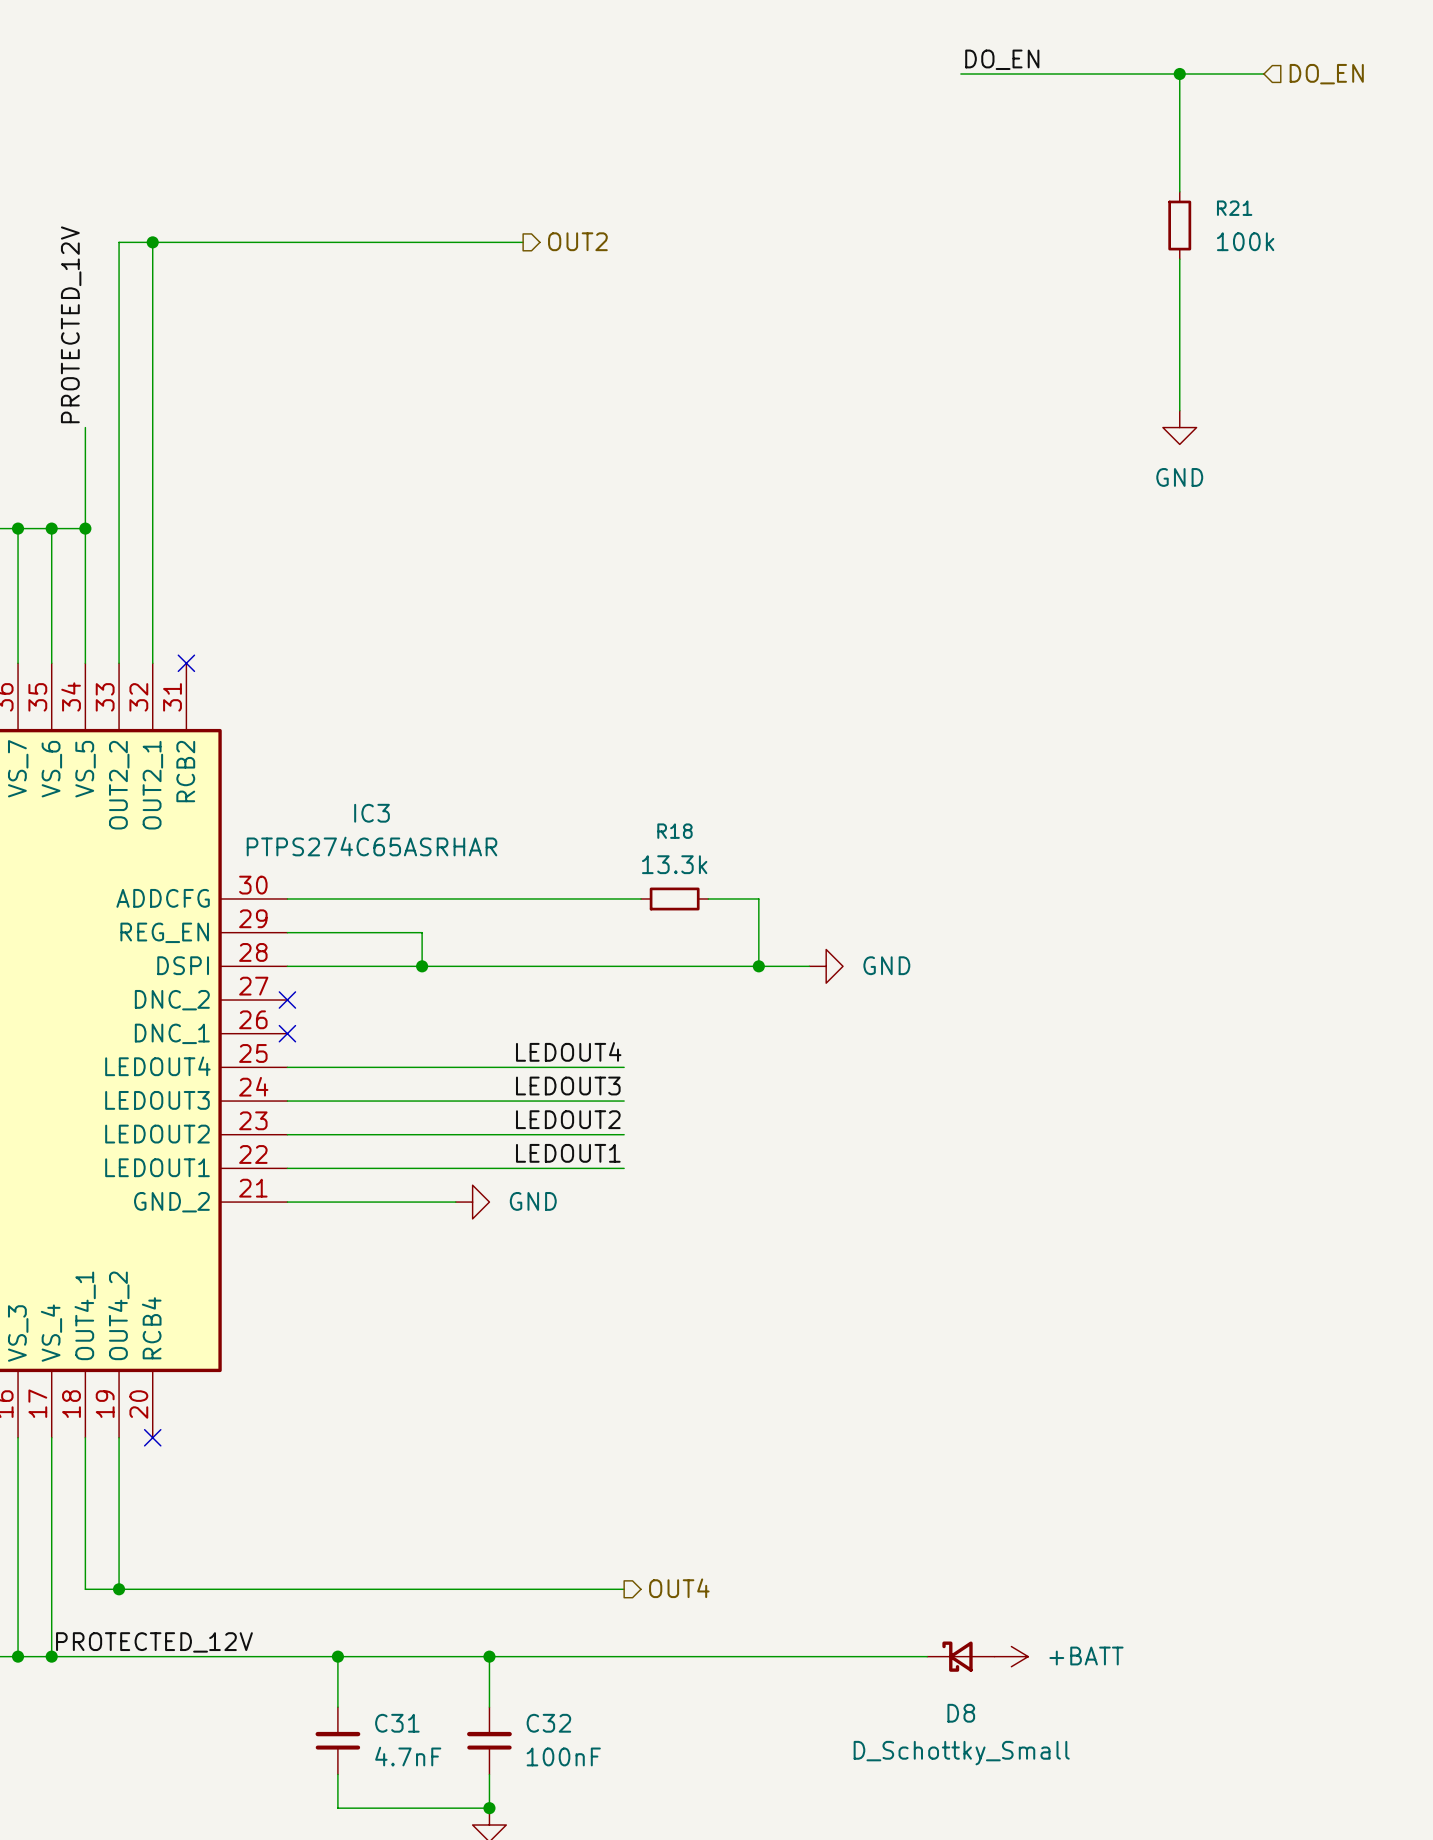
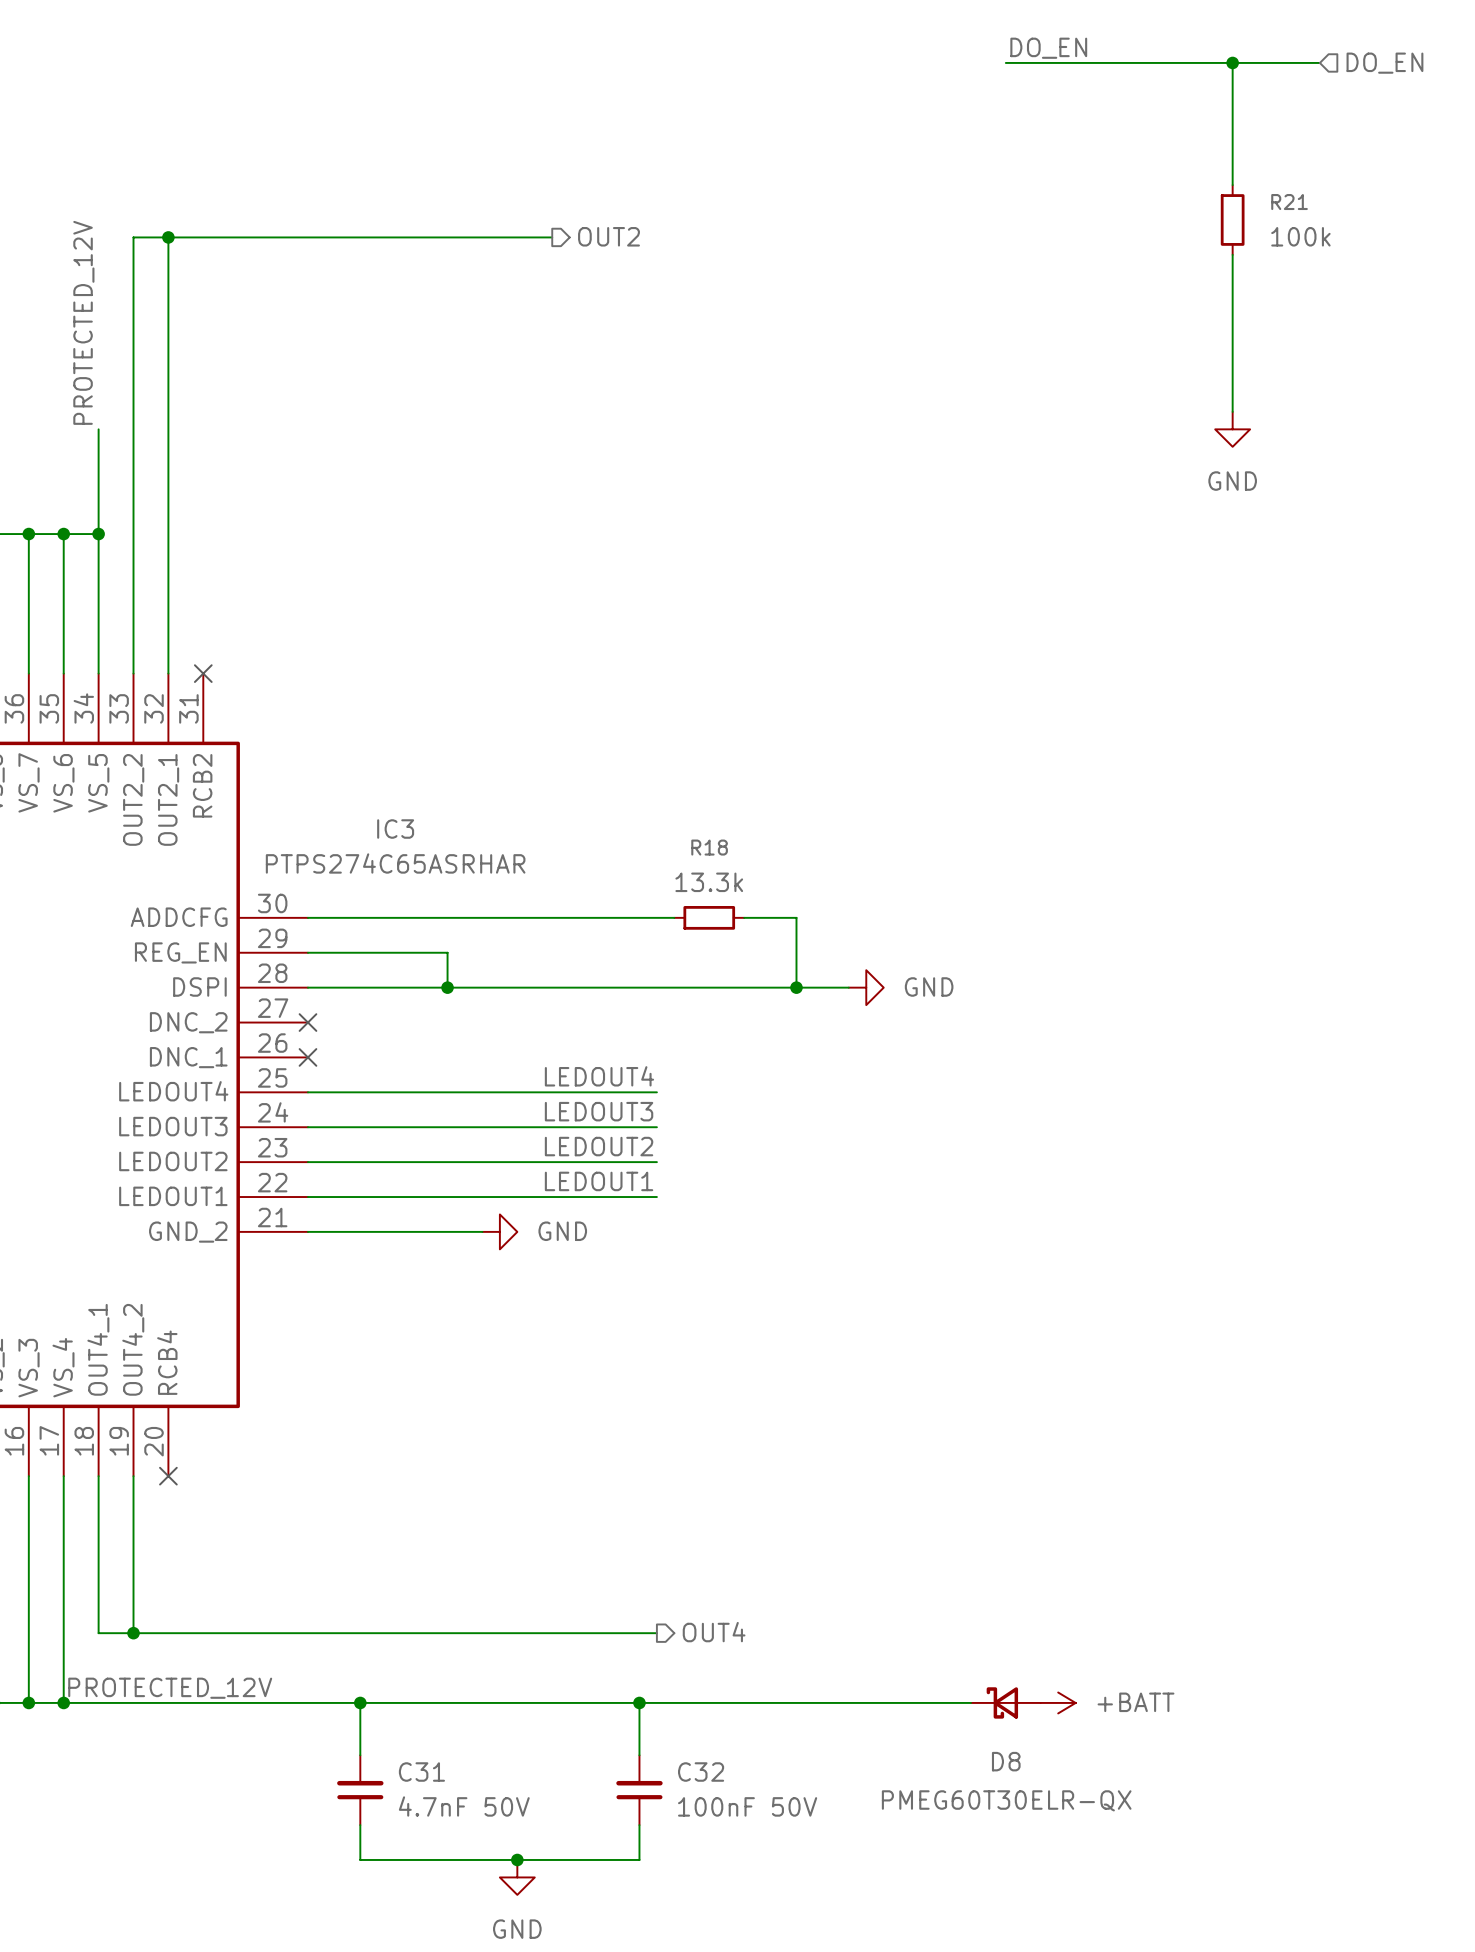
wire: (489, 1656) (489, 1707) -> (639, 1702) (639, 1755)
junction: (489, 1656) -> none
junction: none -> (639, 1702)
C32 position: (489, 1740) -> (639, 1790)
D8 value: D_Schottky_Small (961, 1753) -> PMEG60T30ELR-QX (1006, 1800)
C31 value: 4.7nF (408, 1756) -> 4.7nF 50V (464, 1806)
C32 value: 100nF (563, 1756) -> 100nF 50V (747, 1806)
wire: (489, 1774) (489, 1808) -> (639, 1825) (639, 1859) (517, 1859)

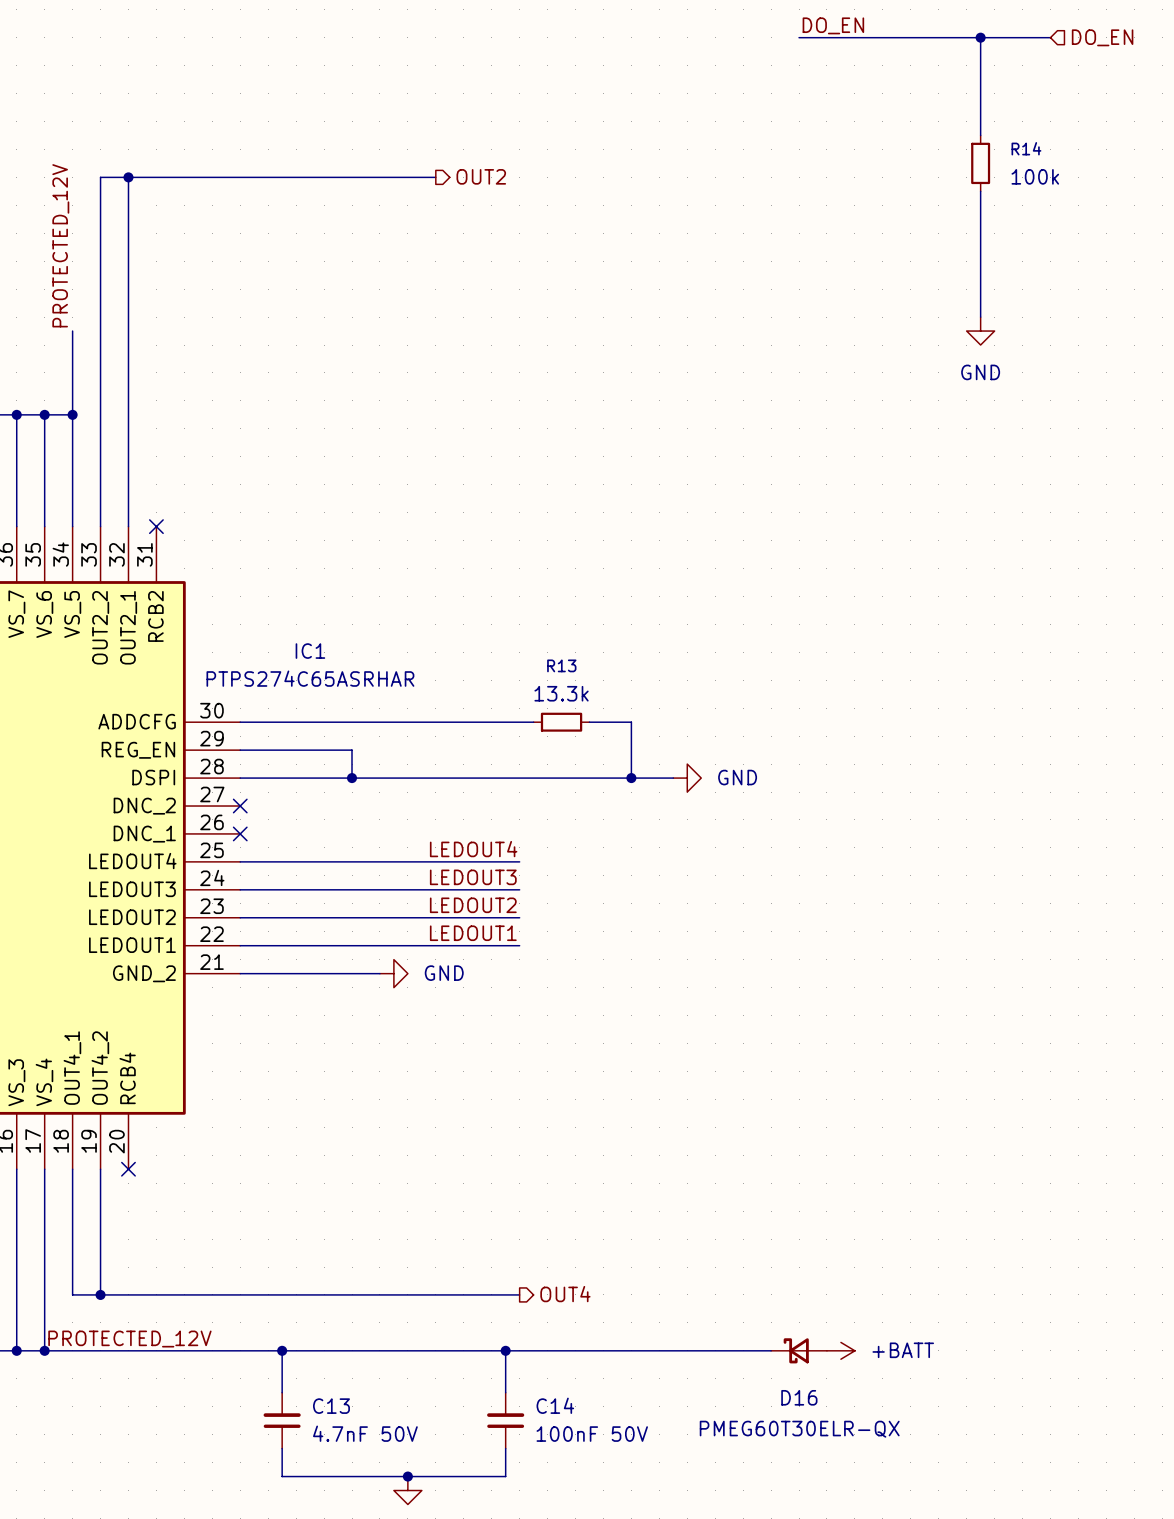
R21 name: R21 (1289, 202) -> R14 (1026, 148)
IC3 name: IC3 (395, 829) -> IC1 (310, 651)
R18 name: R18 (709, 847) -> R13 (561, 665)
D8 name: D8 (1006, 1761) -> D16 (799, 1397)
C31 name: C31 (421, 1772) -> C13 (331, 1406)
C32 name: C32 (701, 1772) -> C14 (555, 1405)

